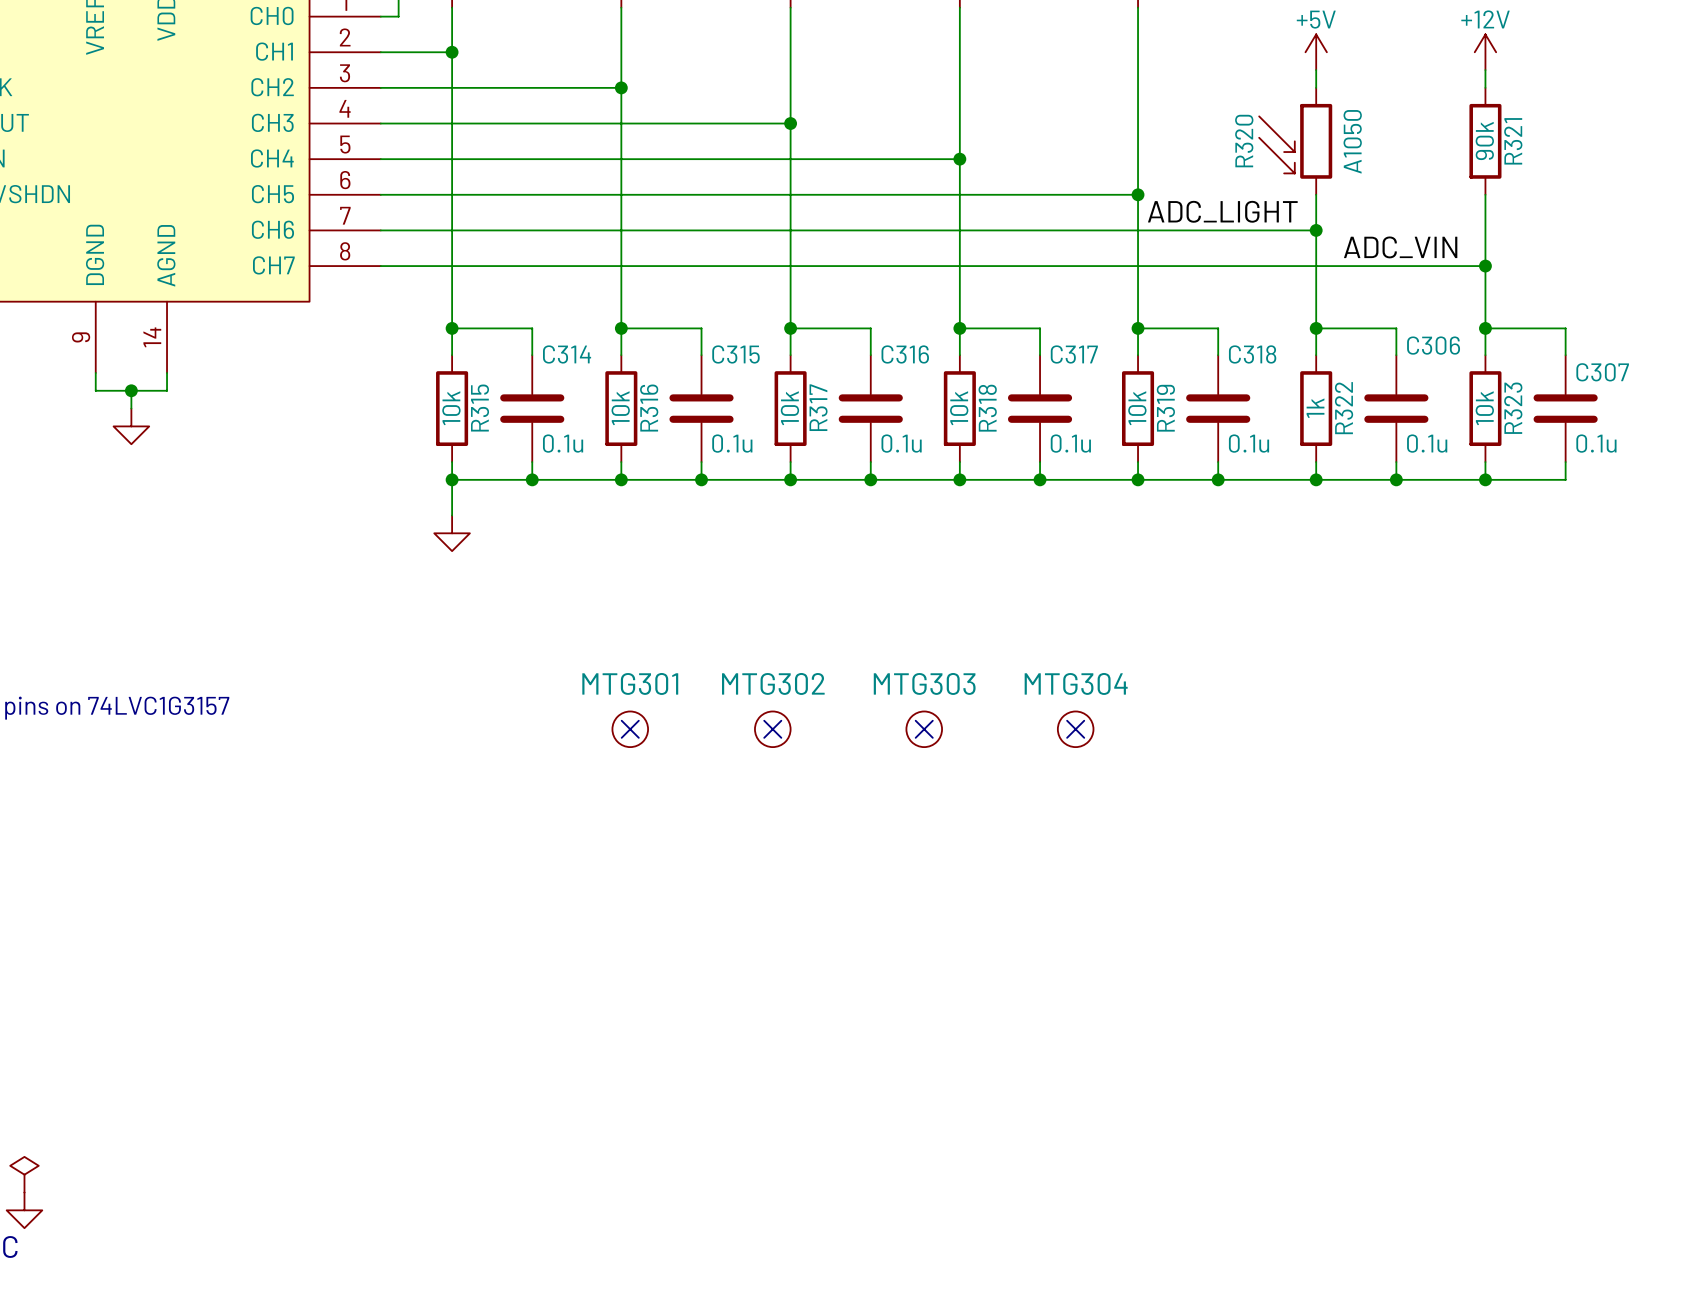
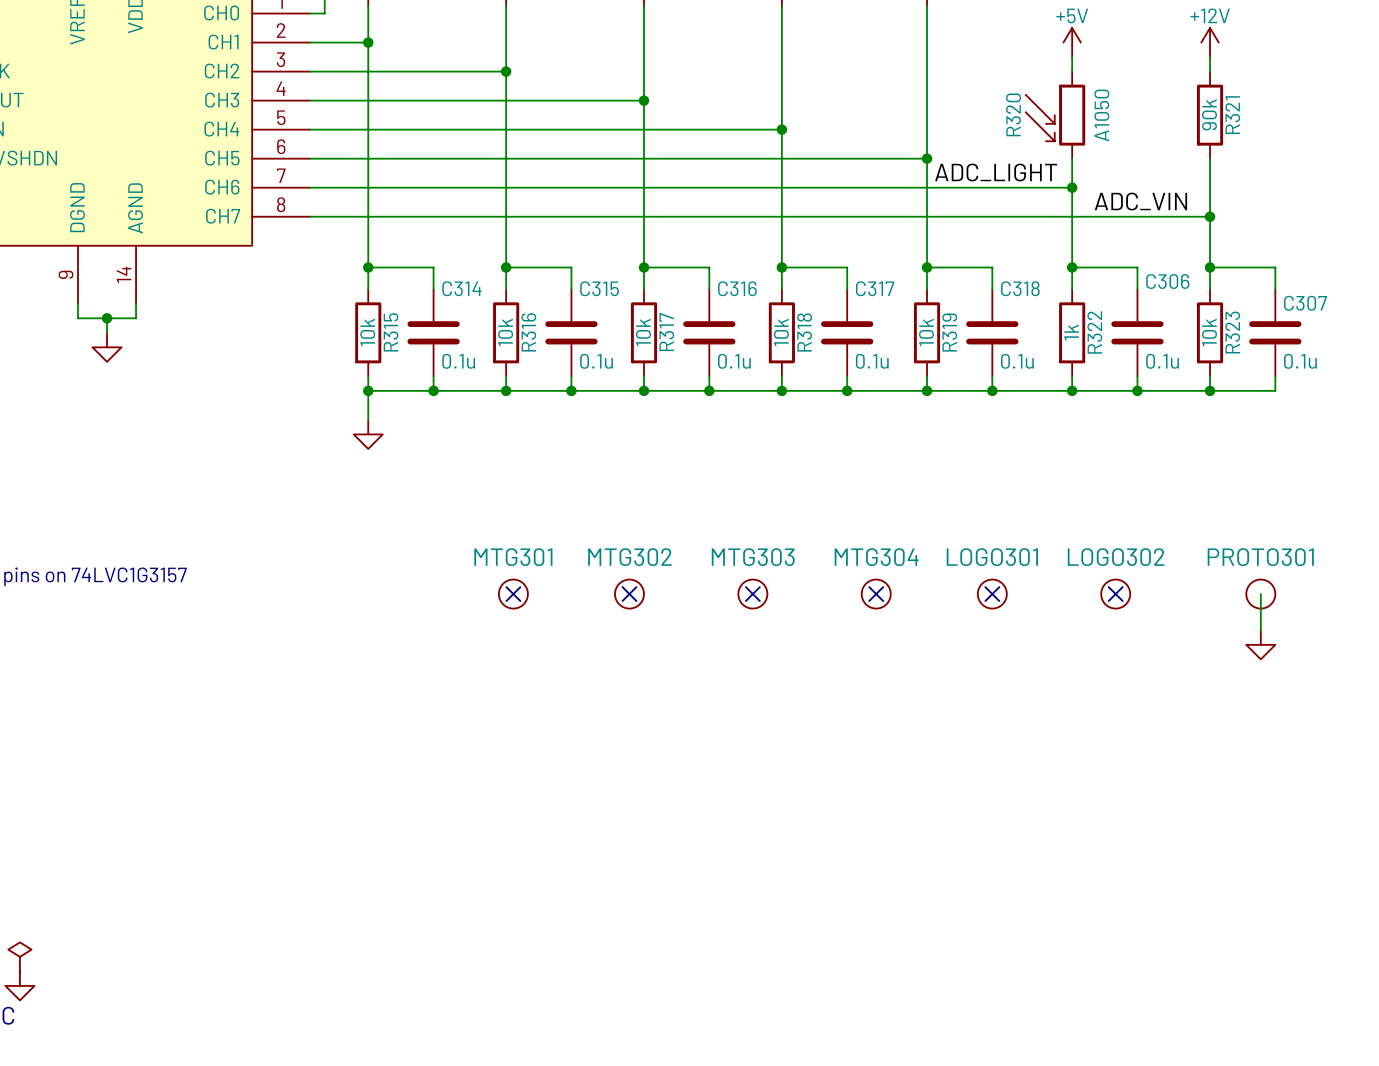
LOGO301: none -> (992, 594)
no-connect mark: none -> (992, 594)
LOGO302: none -> (1115, 594)
no-connect mark: none -> (1115, 594)
wire: none -> (1260, 594) (1260, 630)
PROTO301: none -> (1260, 594)
power symbol: none -> (1260, 644)

